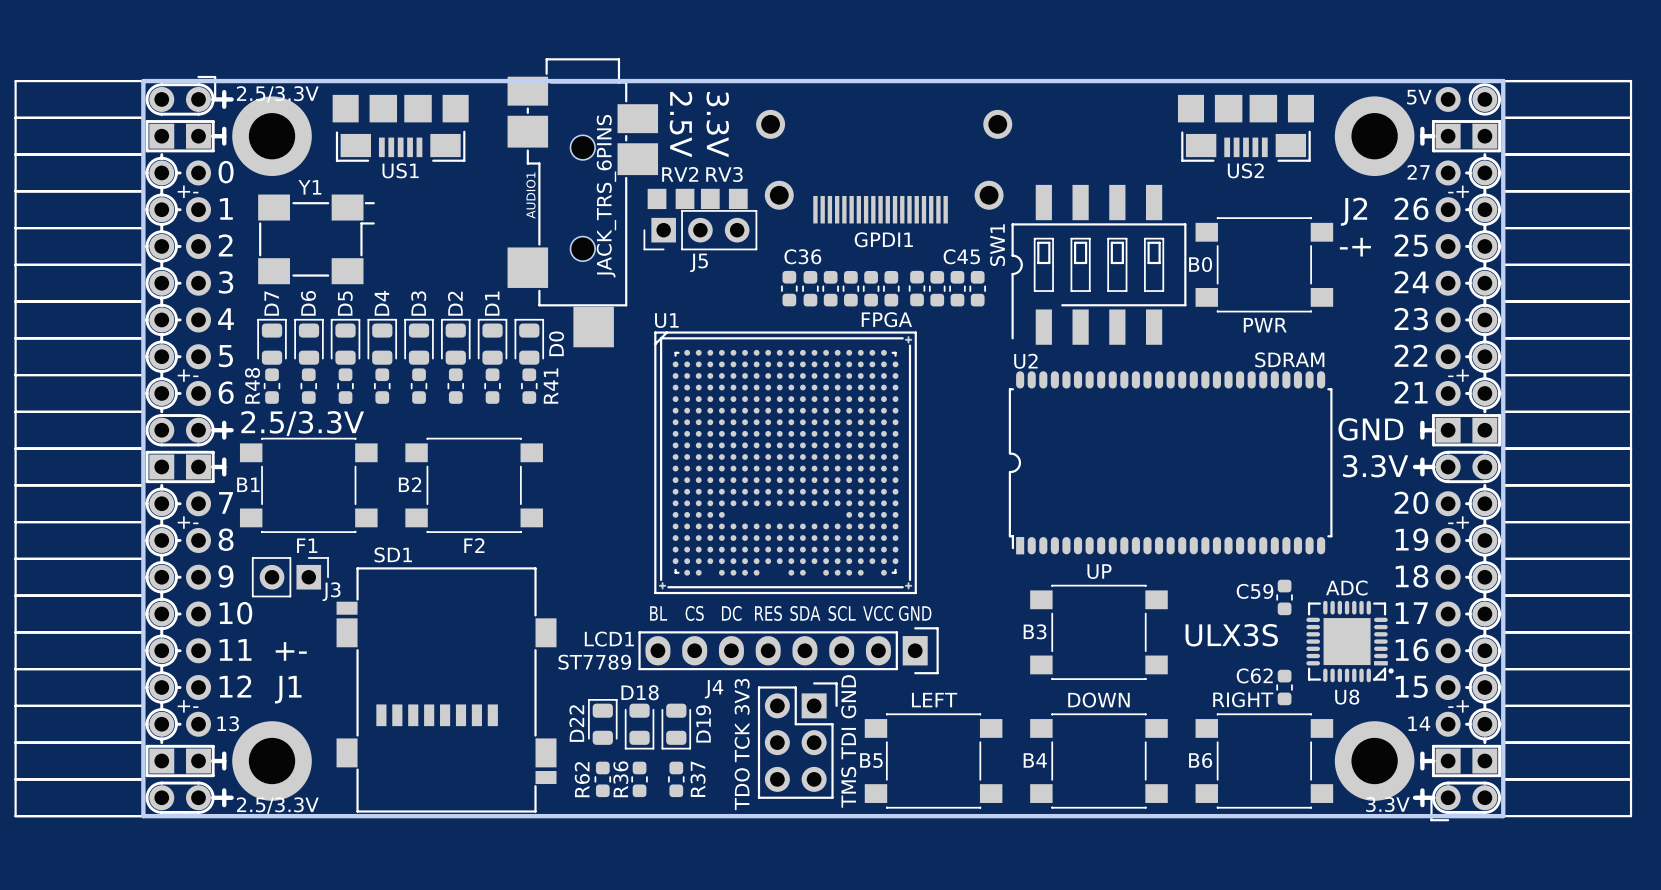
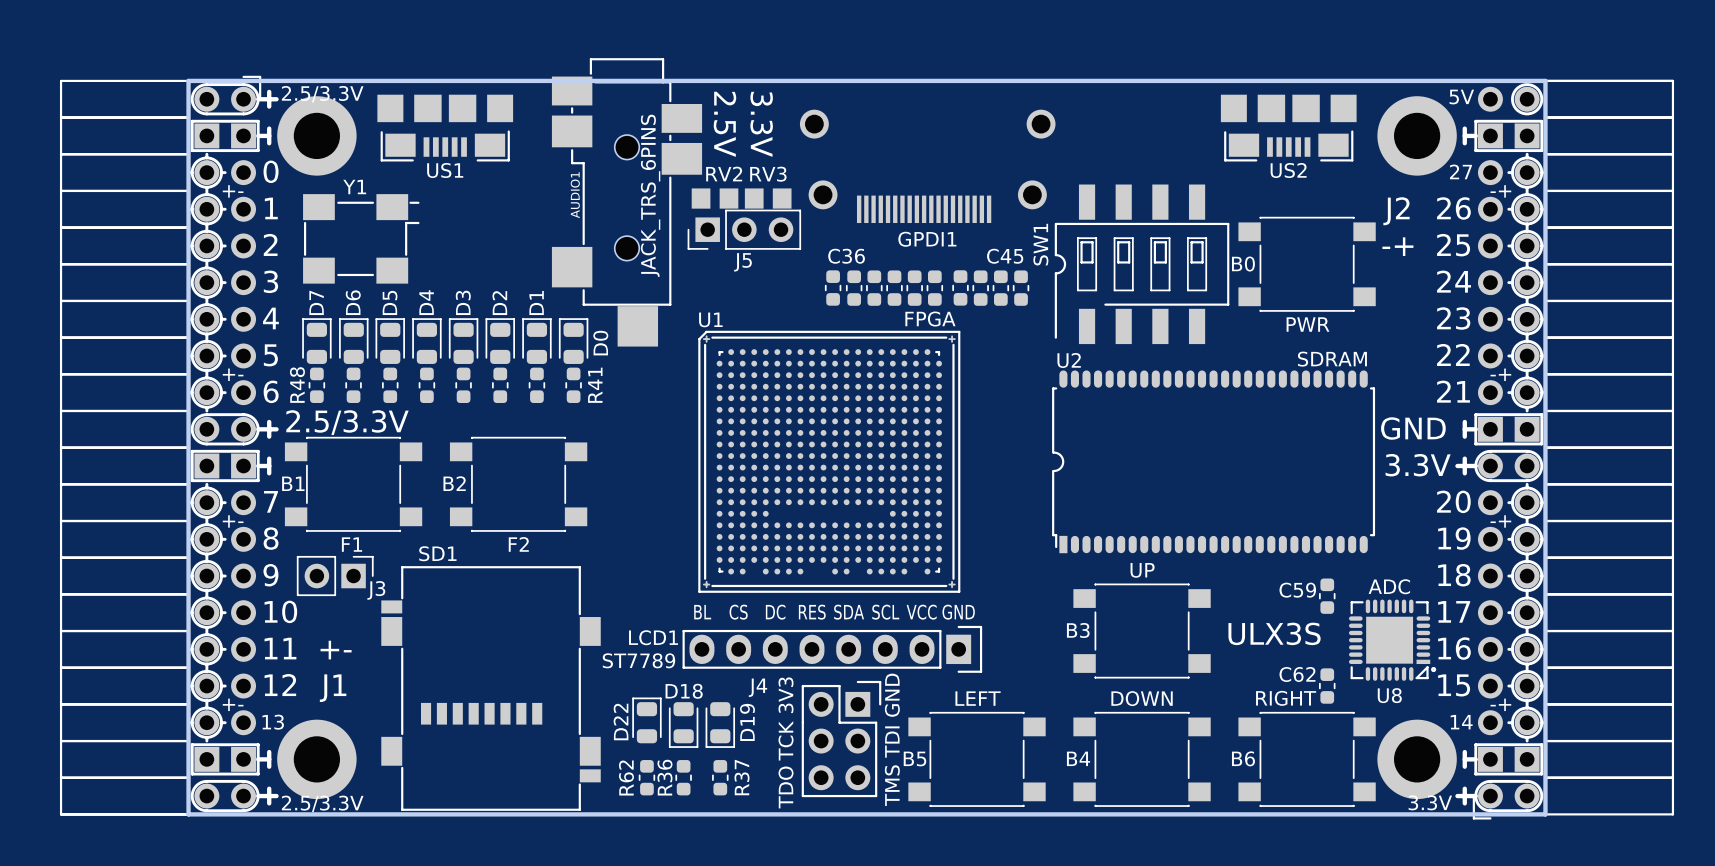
U1 footprint: [654, 331, 917, 595] -> [698, 330, 961, 593]

